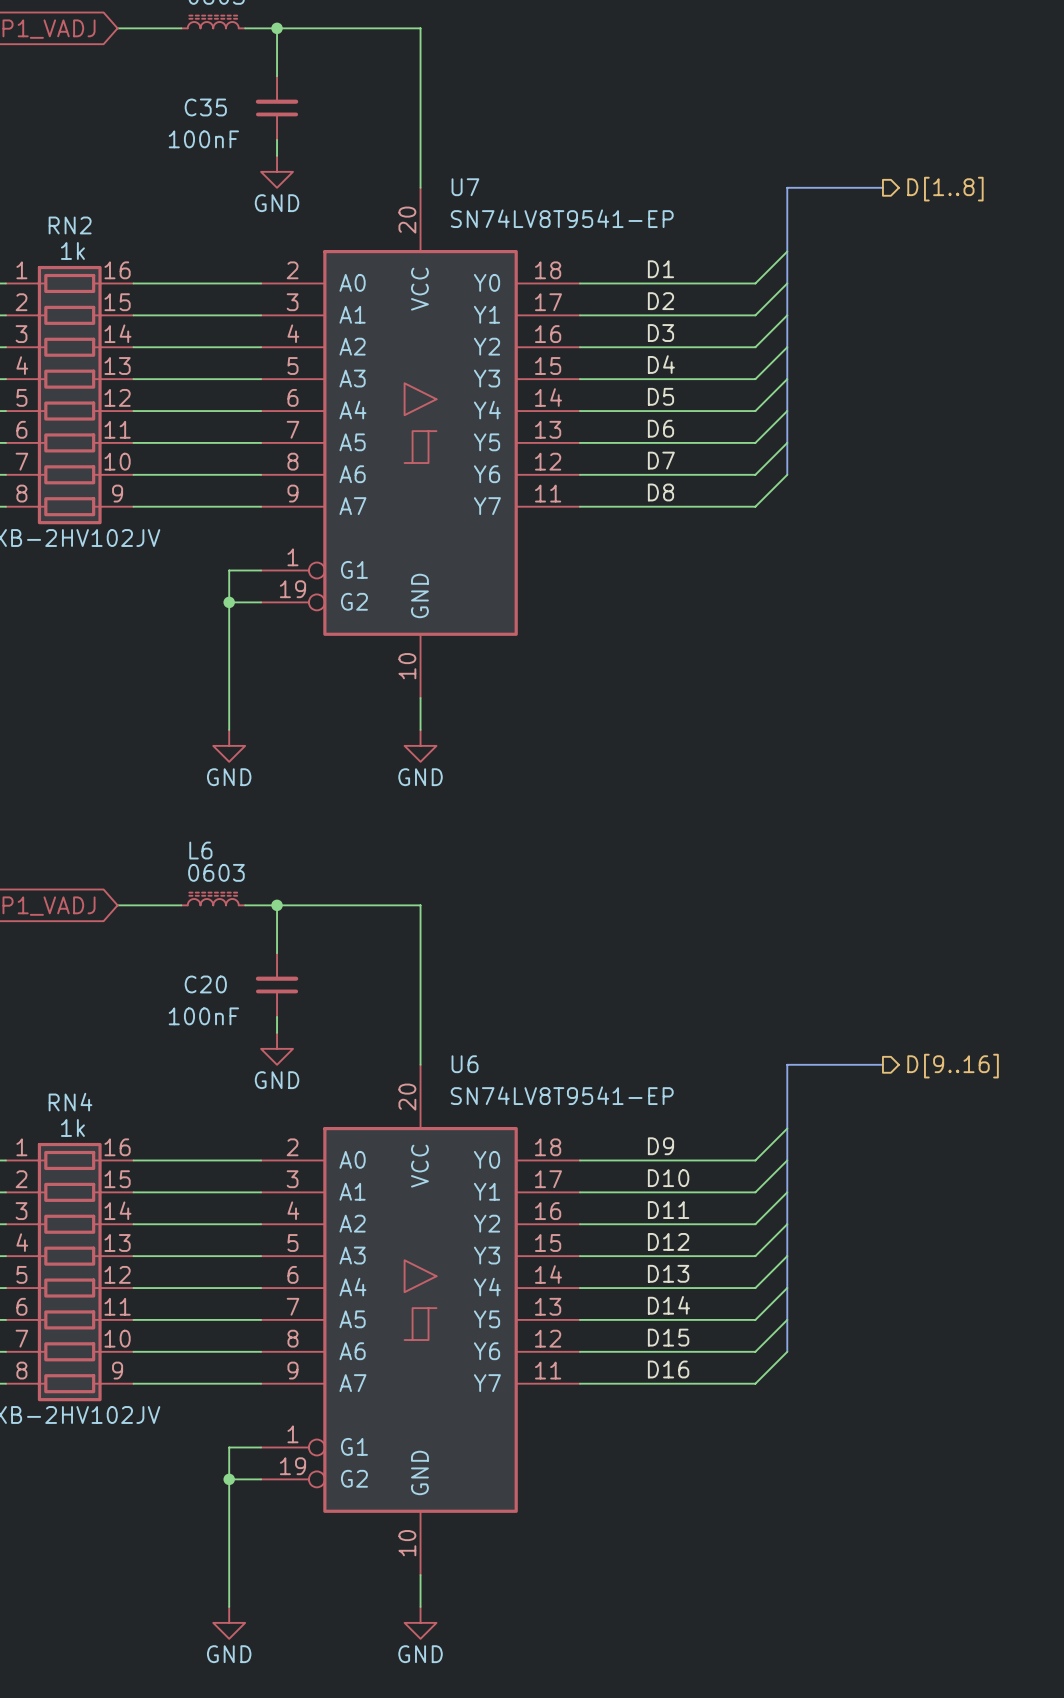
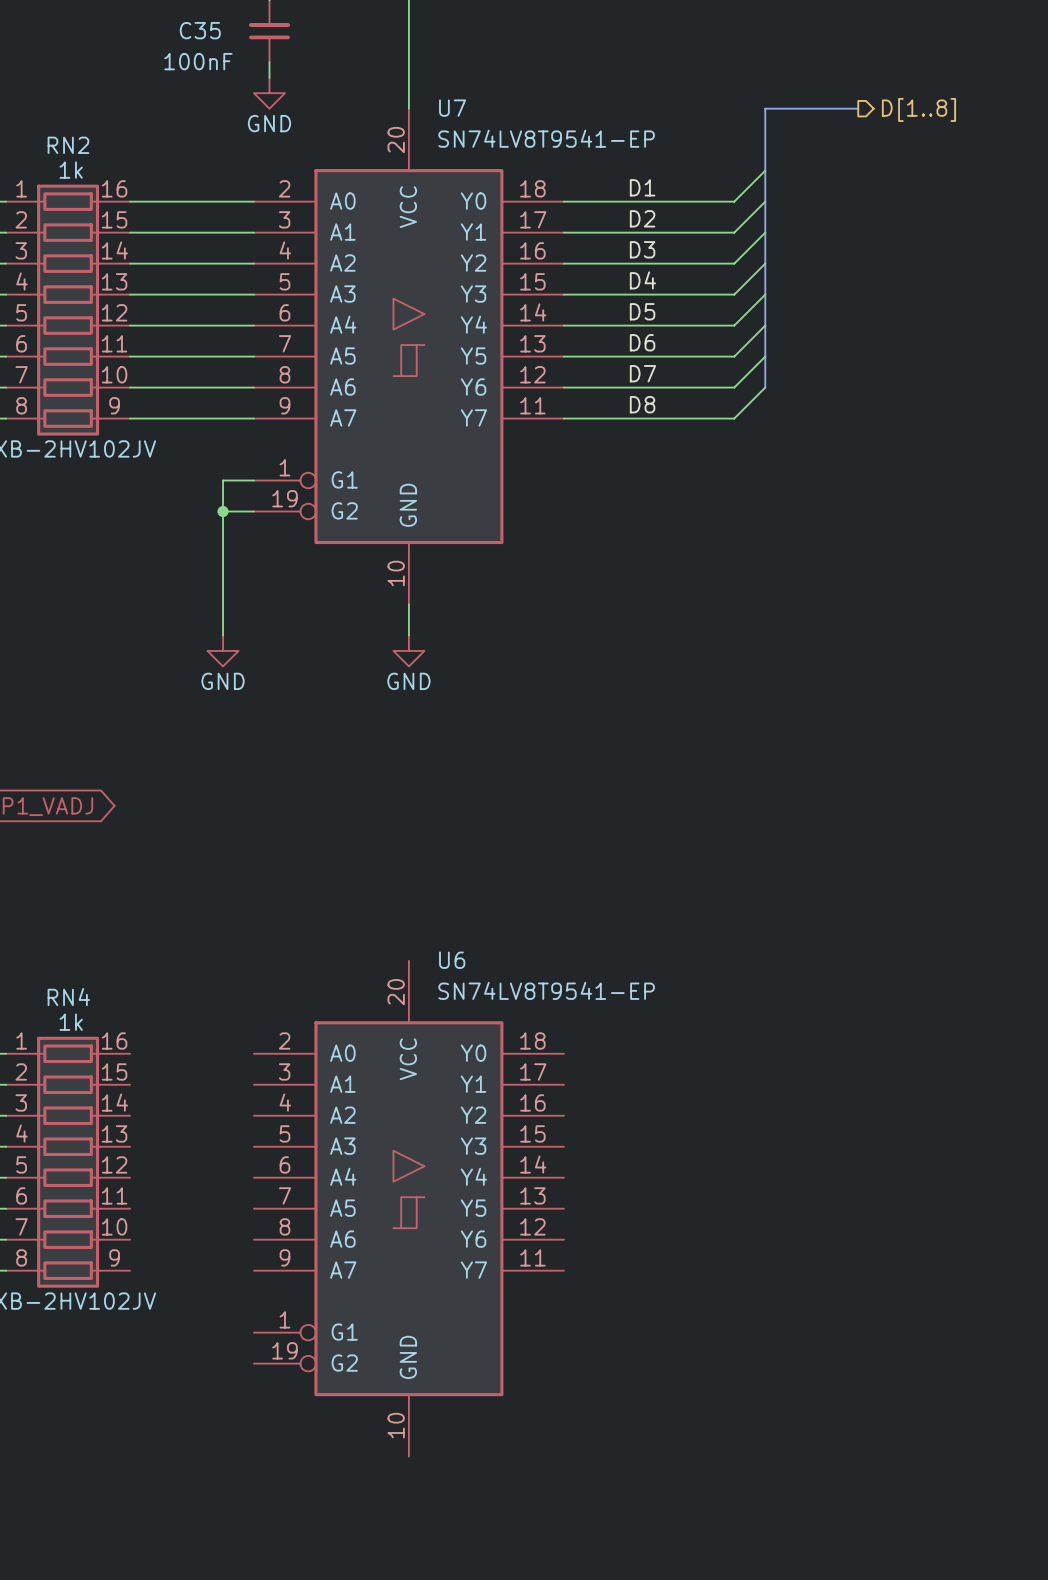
L6: 0603 (213, 898) -> none
wire: (117, 905) (181, 905) -> none
wire: (245, 905) (420, 905) (420, 1064) -> none
wire: (277, 905) (277, 953) -> none
junction: (277, 905) -> none
C20: 100nF (277, 985) -> none
wire: (277, 1016) (277, 1032) -> none
power symbol: GND (277, 1048) -> none
bus: (882, 1064) (787, 1064) (787, 1351) -> none
hierarchical label: D[9..16] (953, 1066) -> none
wire: (787, 1128) (755, 1160) (579, 1160) -> none
label: D9 (660, 1146) -> none
wire: (133, 1160) (261, 1160) -> none
wire: (787, 1160) (755, 1192) (579, 1192) -> none
label: D10 (668, 1178) -> none
wire: (133, 1192) (261, 1192) -> none
wire: (787, 1192) (755, 1224) (579, 1224) -> none
label: D11 (668, 1210) -> none
wire: (133, 1224) (261, 1224) -> none
wire: (787, 1224) (755, 1256) (579, 1256) -> none
label: D12 (668, 1241) -> none
wire: (133, 1256) (261, 1256) -> none
wire: (787, 1256) (755, 1288) (579, 1288) -> none
label: D13 (668, 1273) -> none
wire: (133, 1288) (261, 1288) -> none
wire: (787, 1288) (755, 1319) (579, 1319) -> none
label: D14 (668, 1305) -> none
wire: (133, 1319) (261, 1319) -> none
wire: (787, 1319) (755, 1351) (579, 1351) -> none
label: D15 (668, 1337) -> none
wire: (133, 1351) (261, 1351) -> none
wire: (787, 1351) (755, 1383) (579, 1383) -> none
label: D16 (668, 1369) -> none
wire: (133, 1383) (261, 1383) -> none
wire: (261, 1447) (229, 1447) (229, 1606) -> none
wire: (229, 1479) (261, 1479) -> none
junction: (229, 1479) -> none
wire: (420, 1575) (420, 1606) -> none
power symbol: GND (229, 1622) -> none
power symbol: GND (420, 1622) -> none

